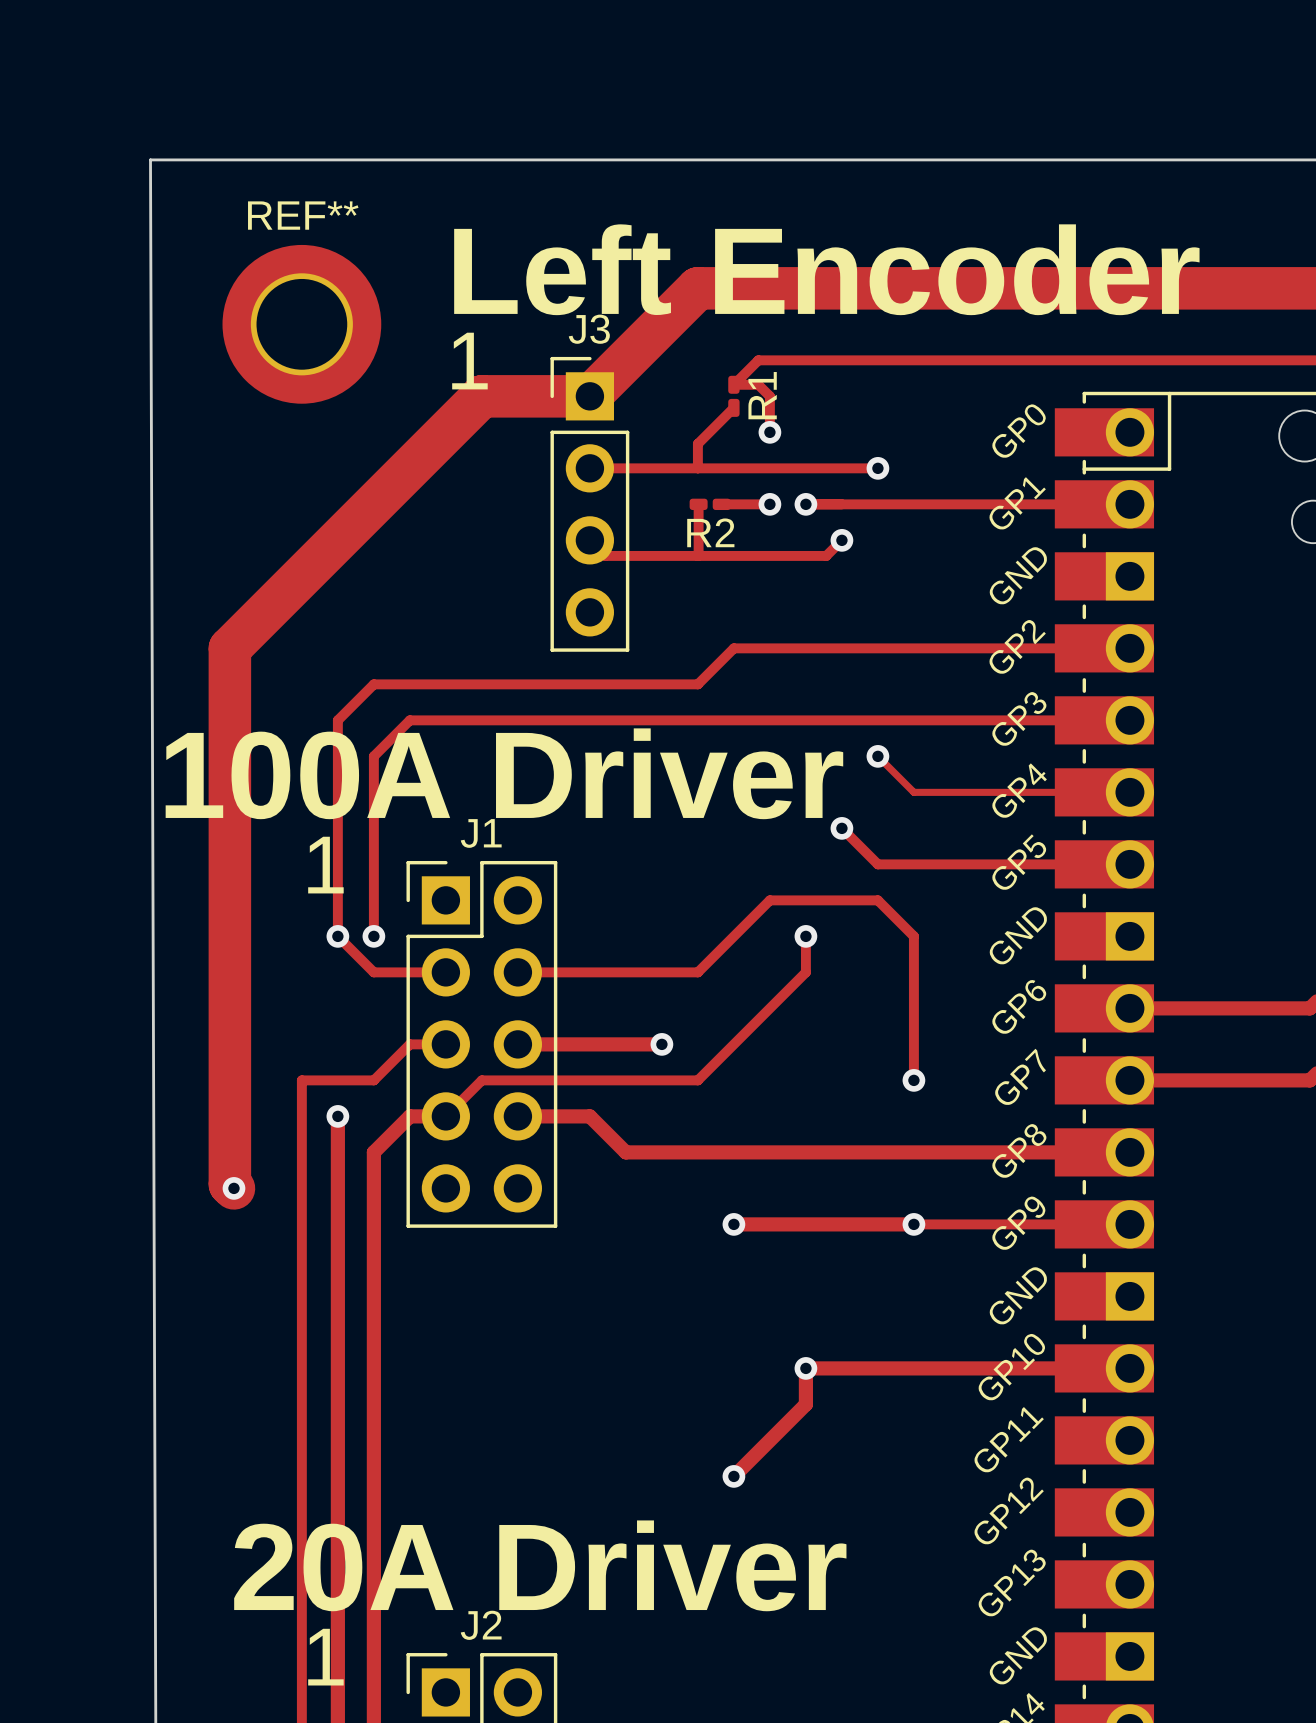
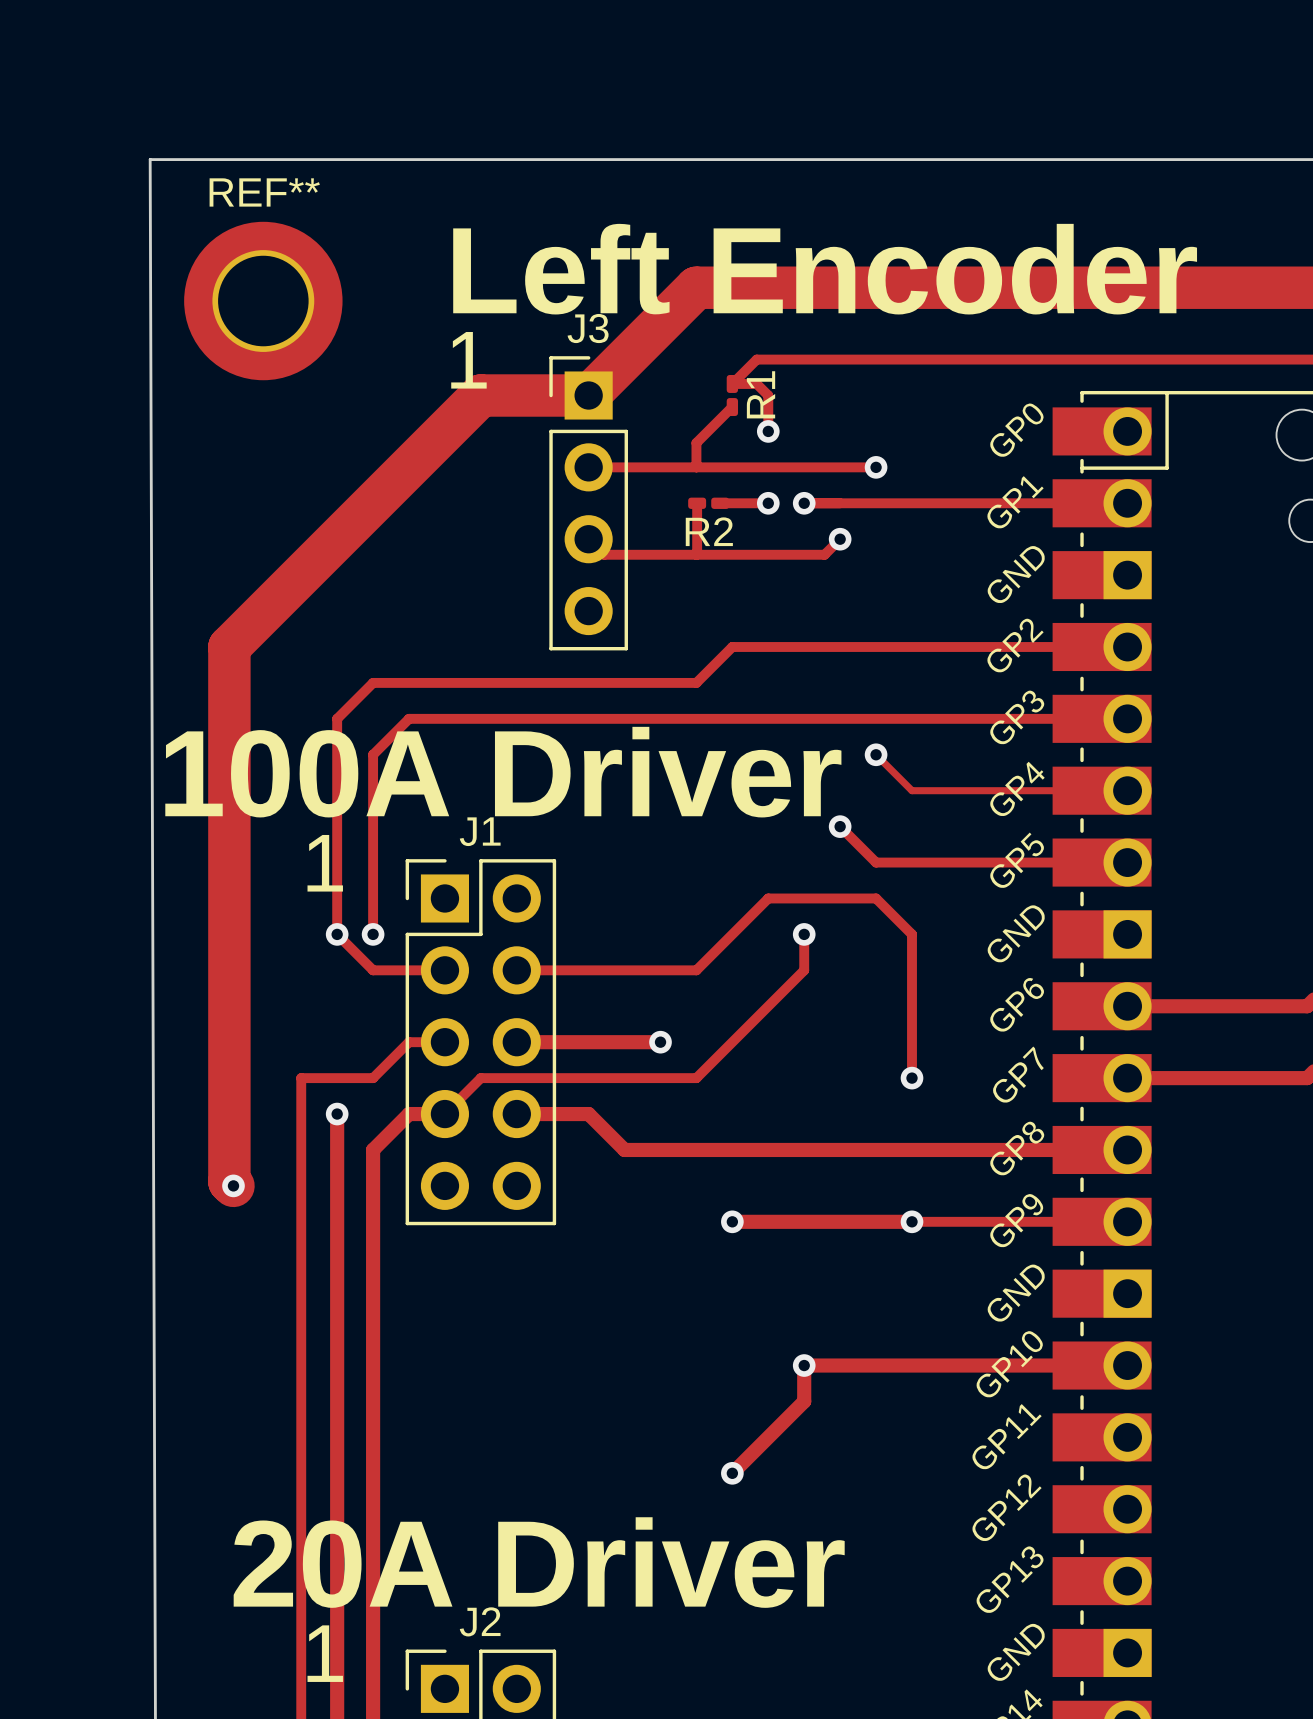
REF** position: (301, 324) -> (263, 301)

